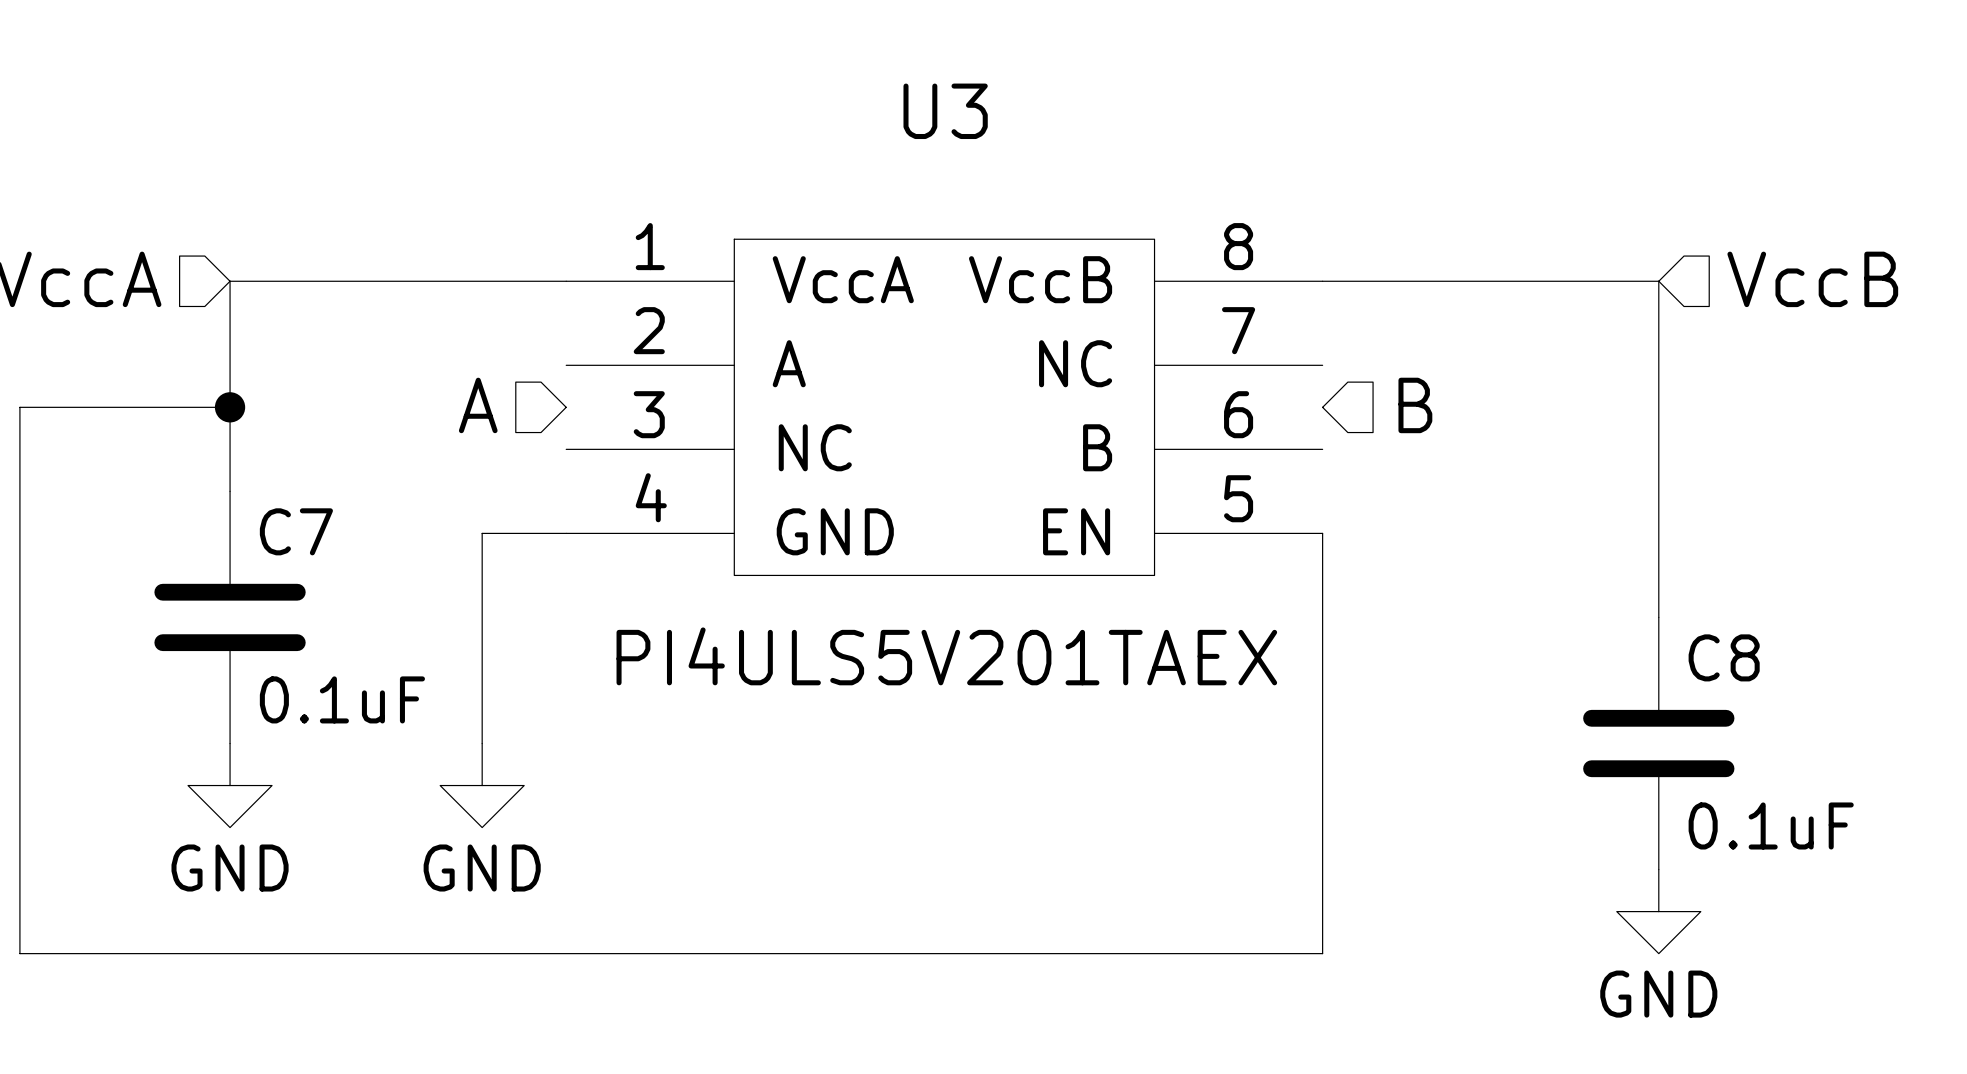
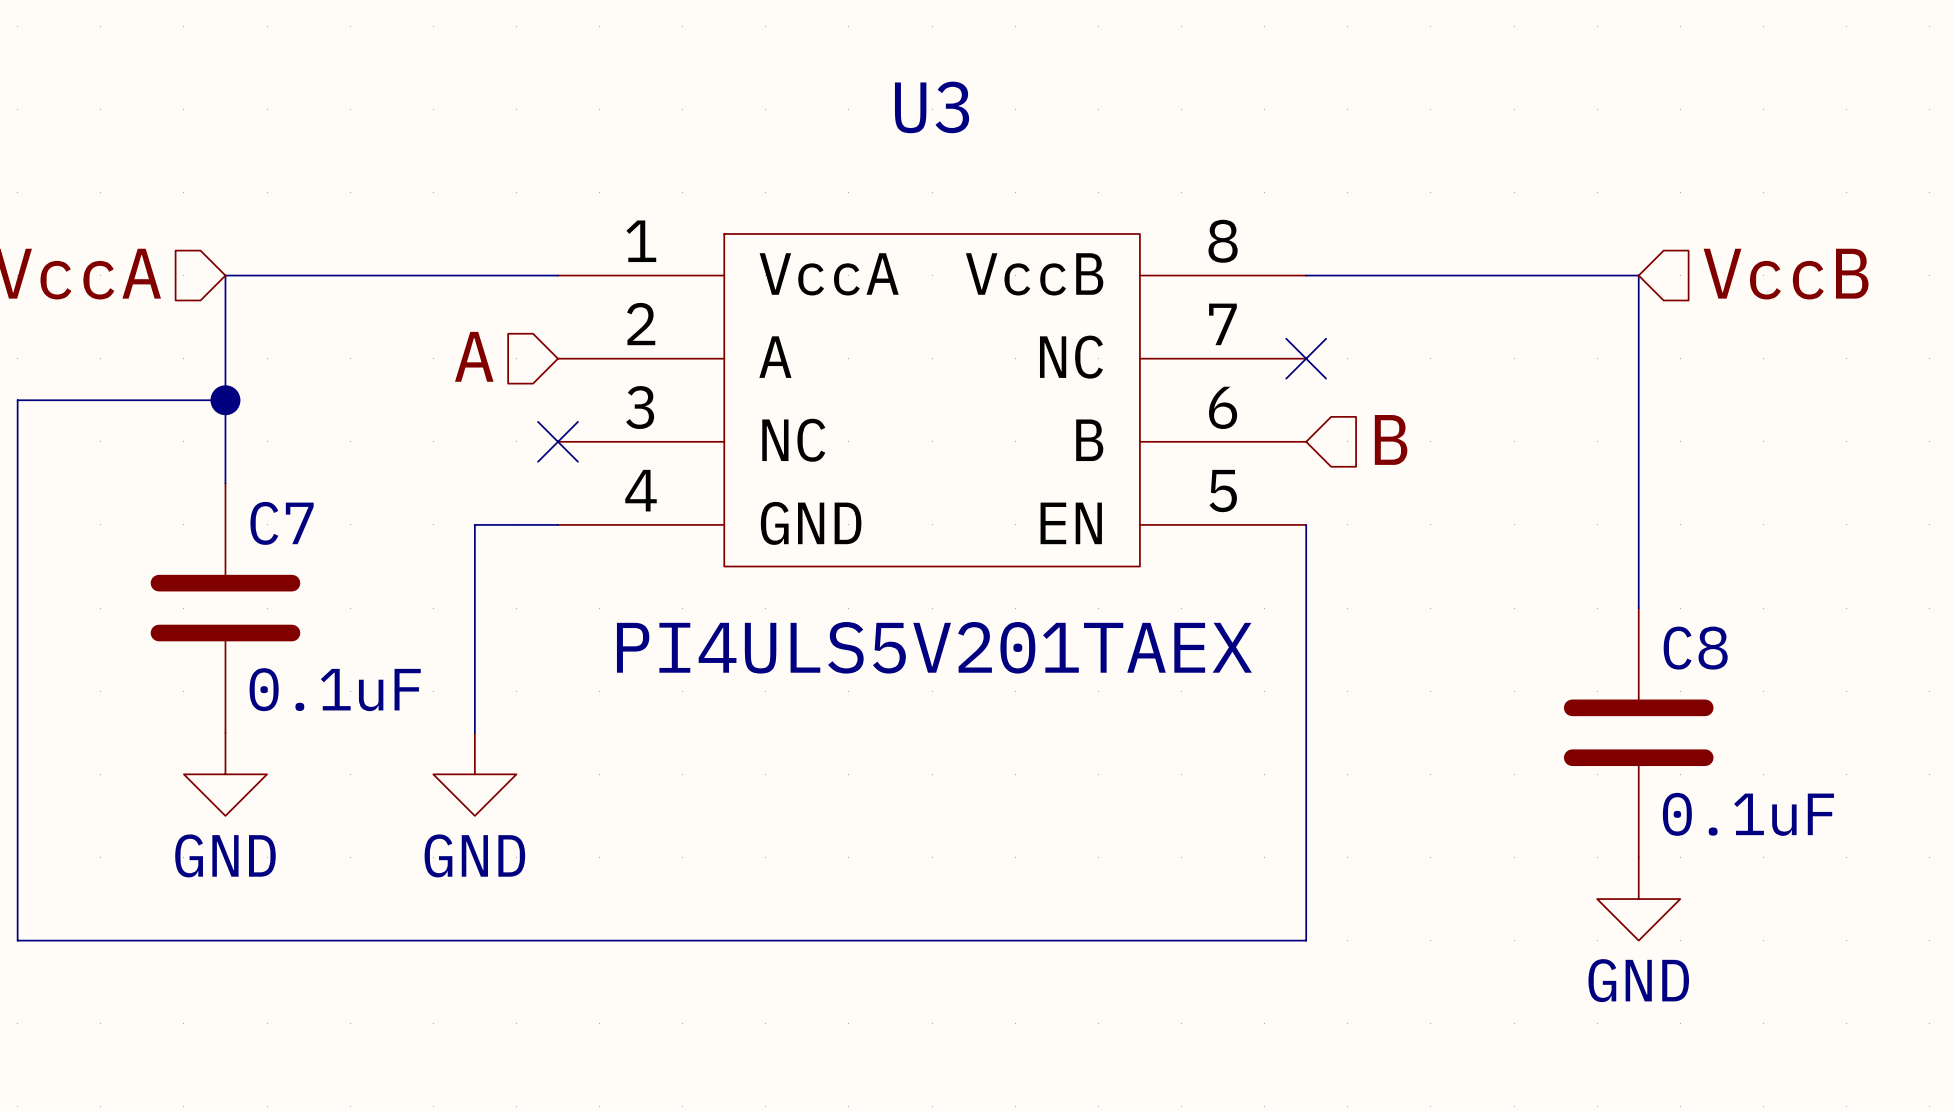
no-connect mark: none -> (1306, 358)
hierarchical label position: A (478, 405) -> A (474, 356)
hierarchical label position: B (1415, 405) -> B (1391, 439)
no-connect mark: none -> (558, 441)

